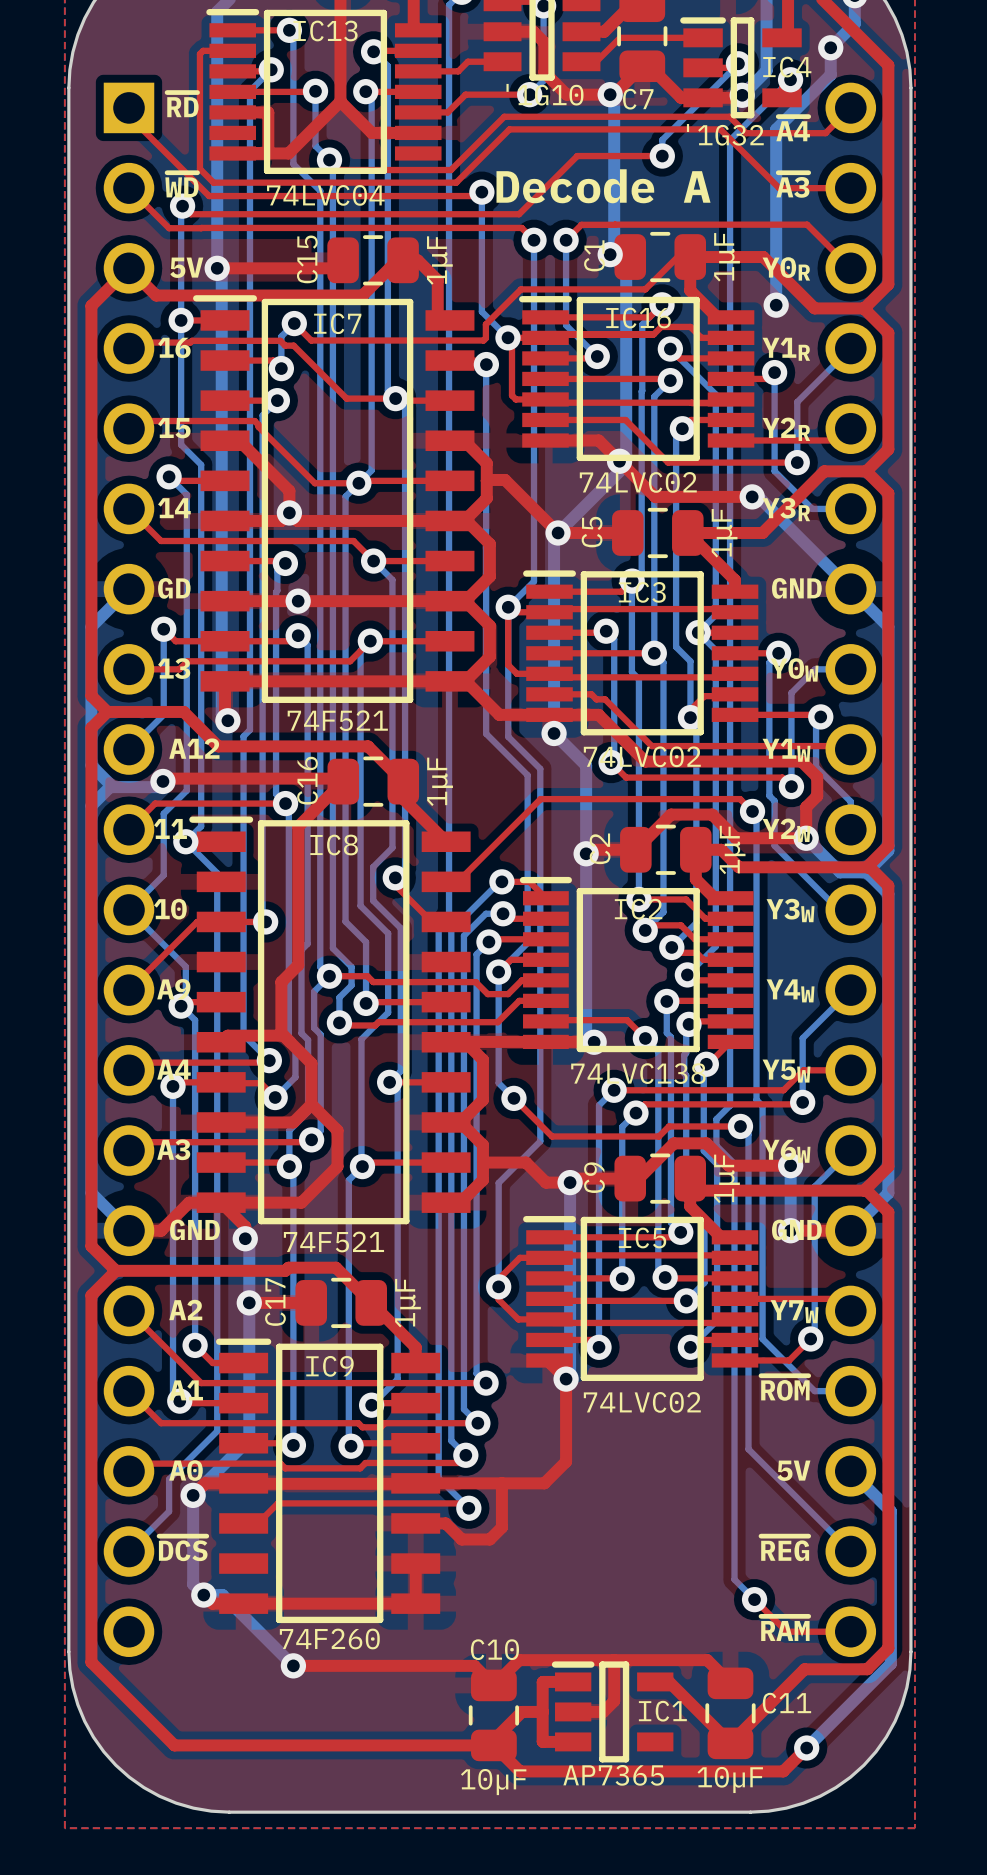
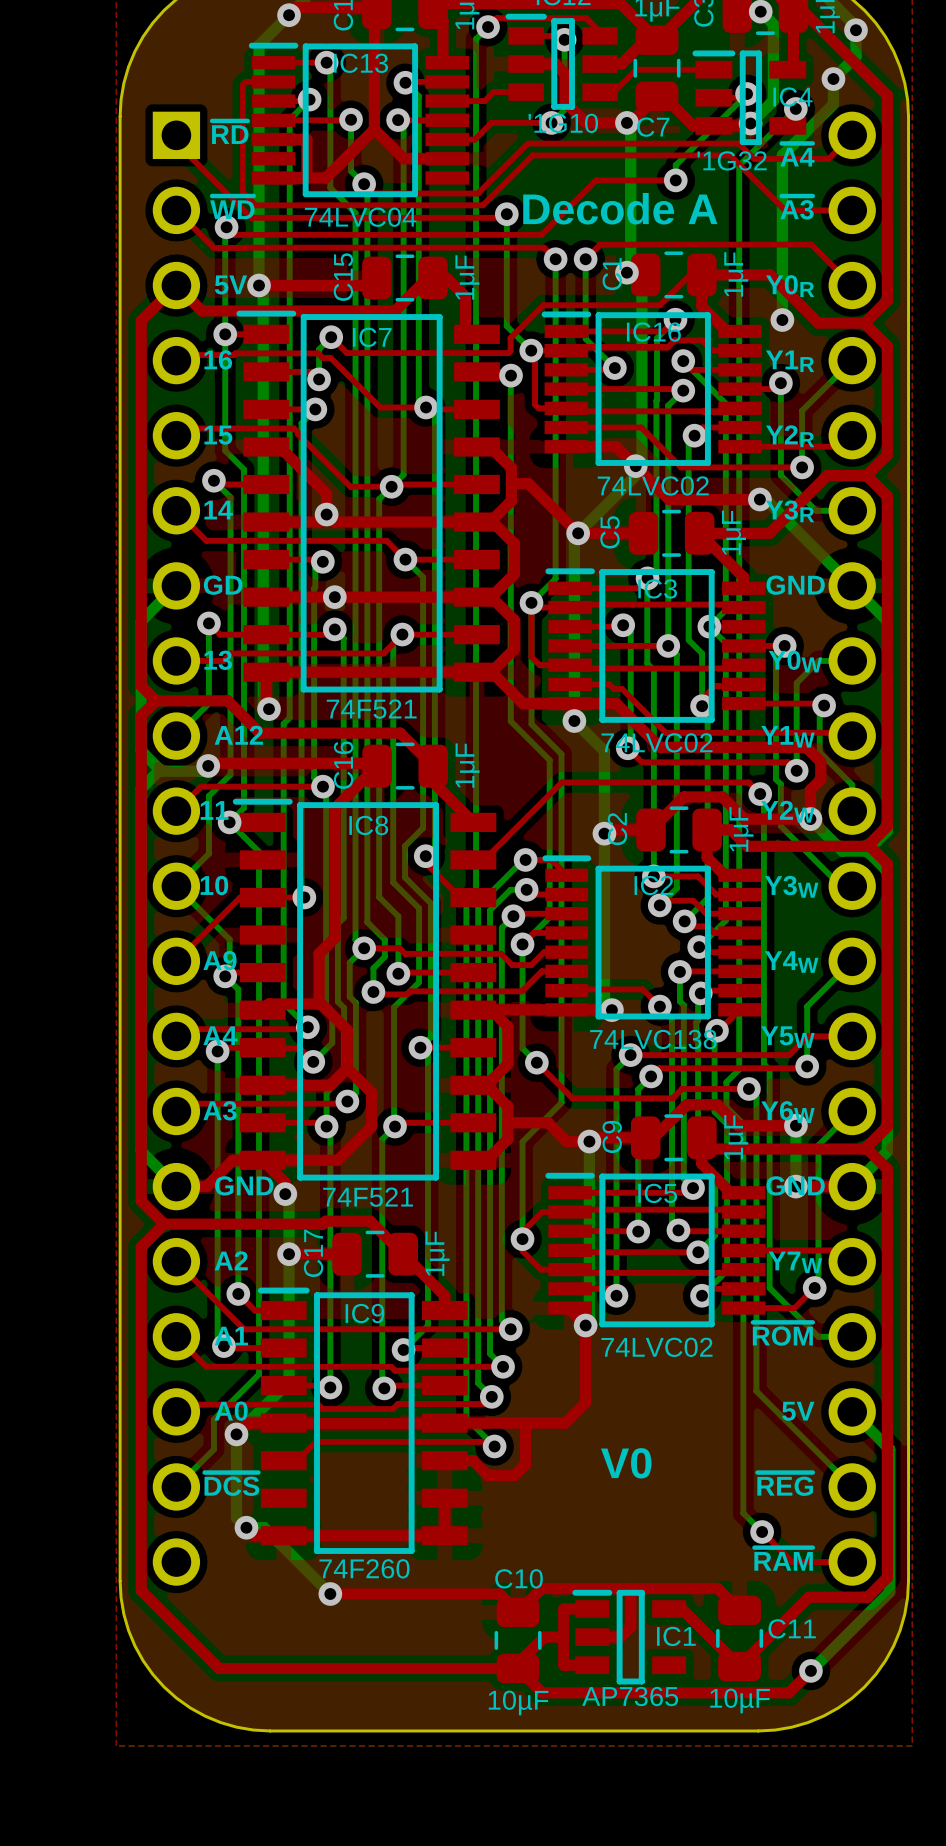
text: none -> V0 (626, 1463)

